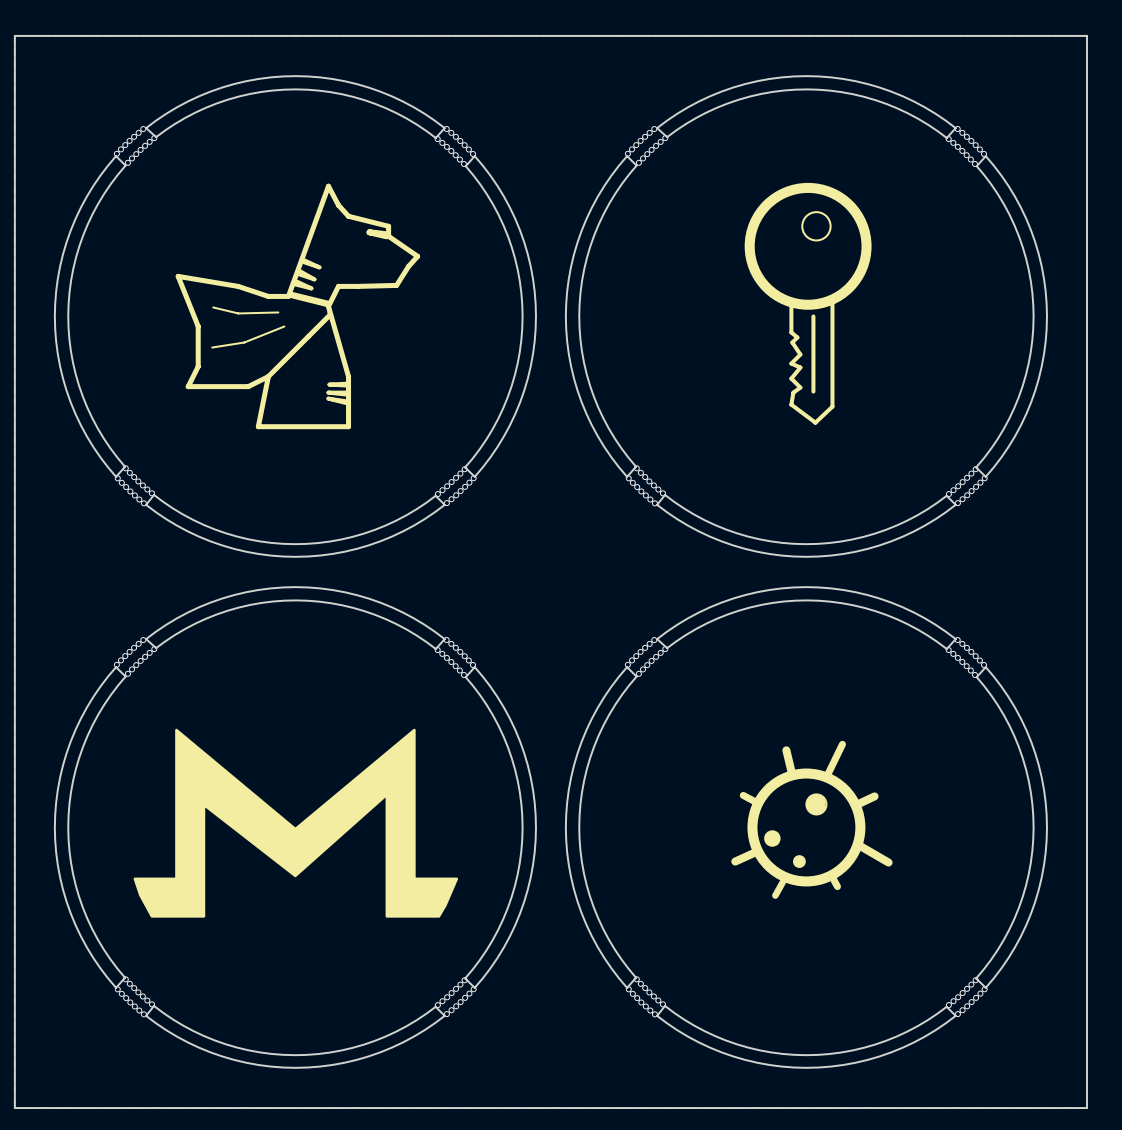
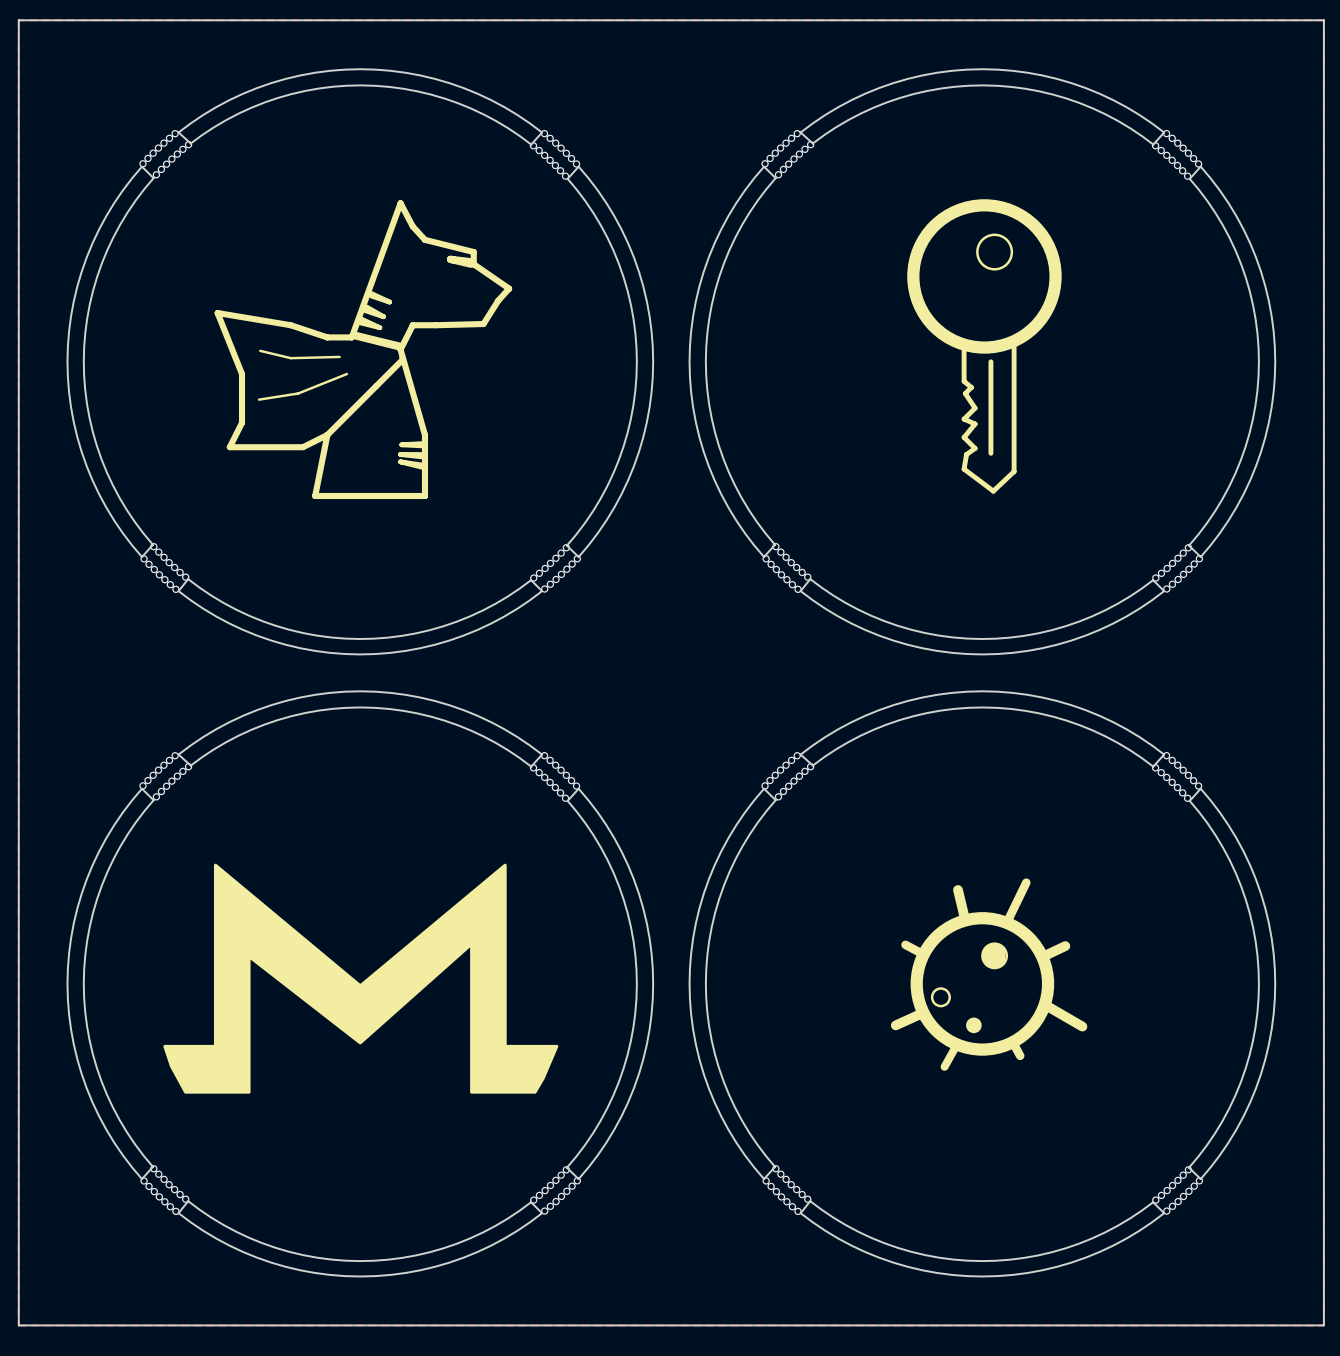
drawing: [765, 831, 780, 846] -> none

